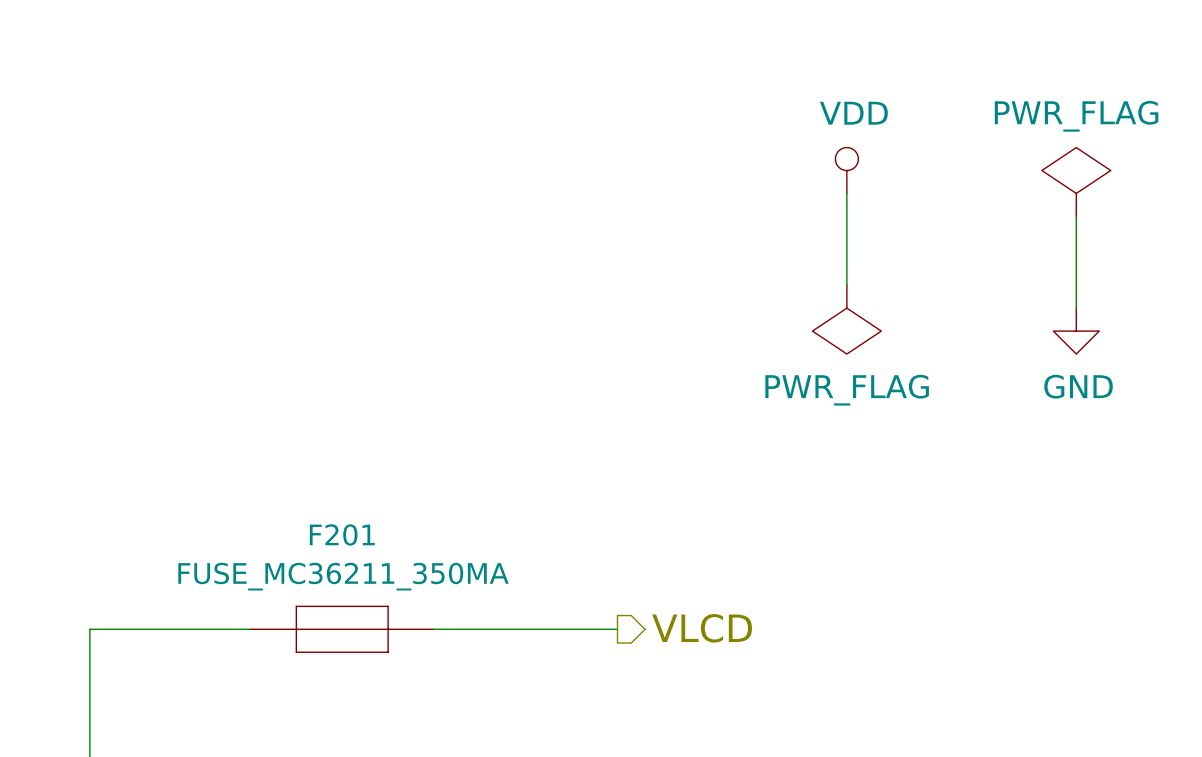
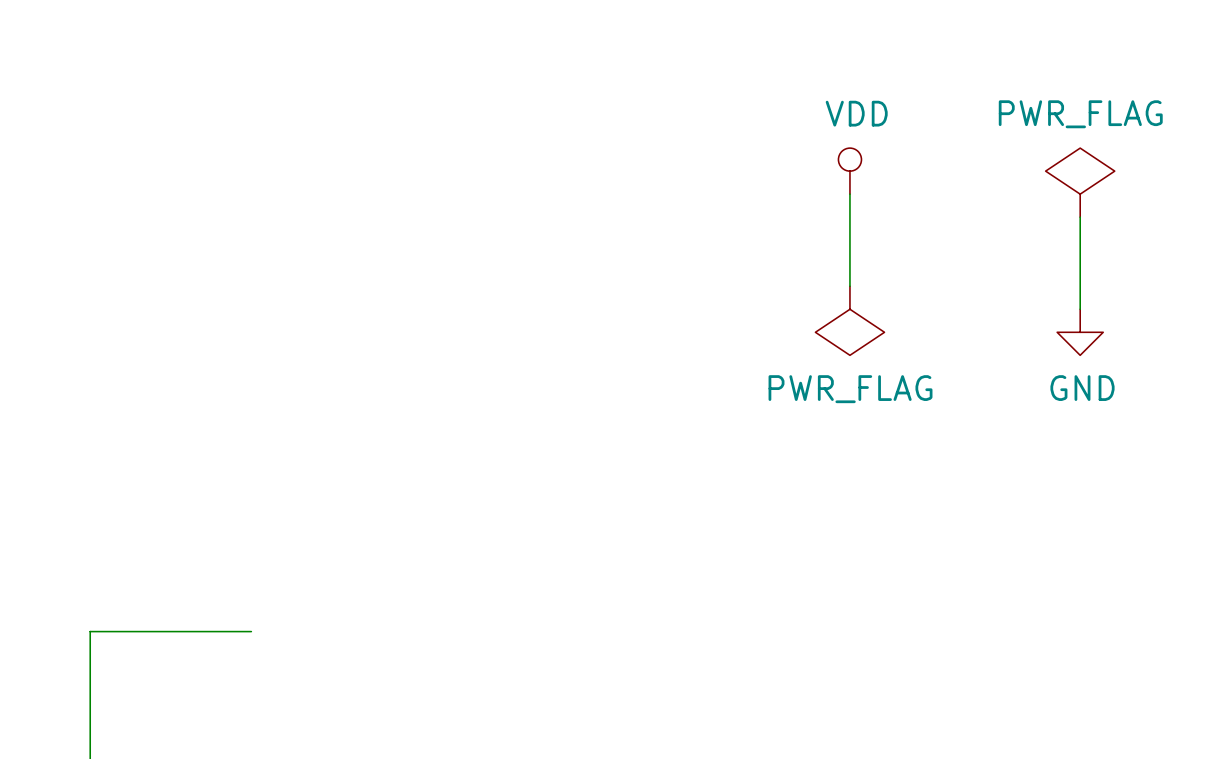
hierarchical label: VLCD (702, 628) -> none
F201: FUSE_MC36211_350MA (342, 629) -> none
wire: (433, 629) (617, 629) -> none

